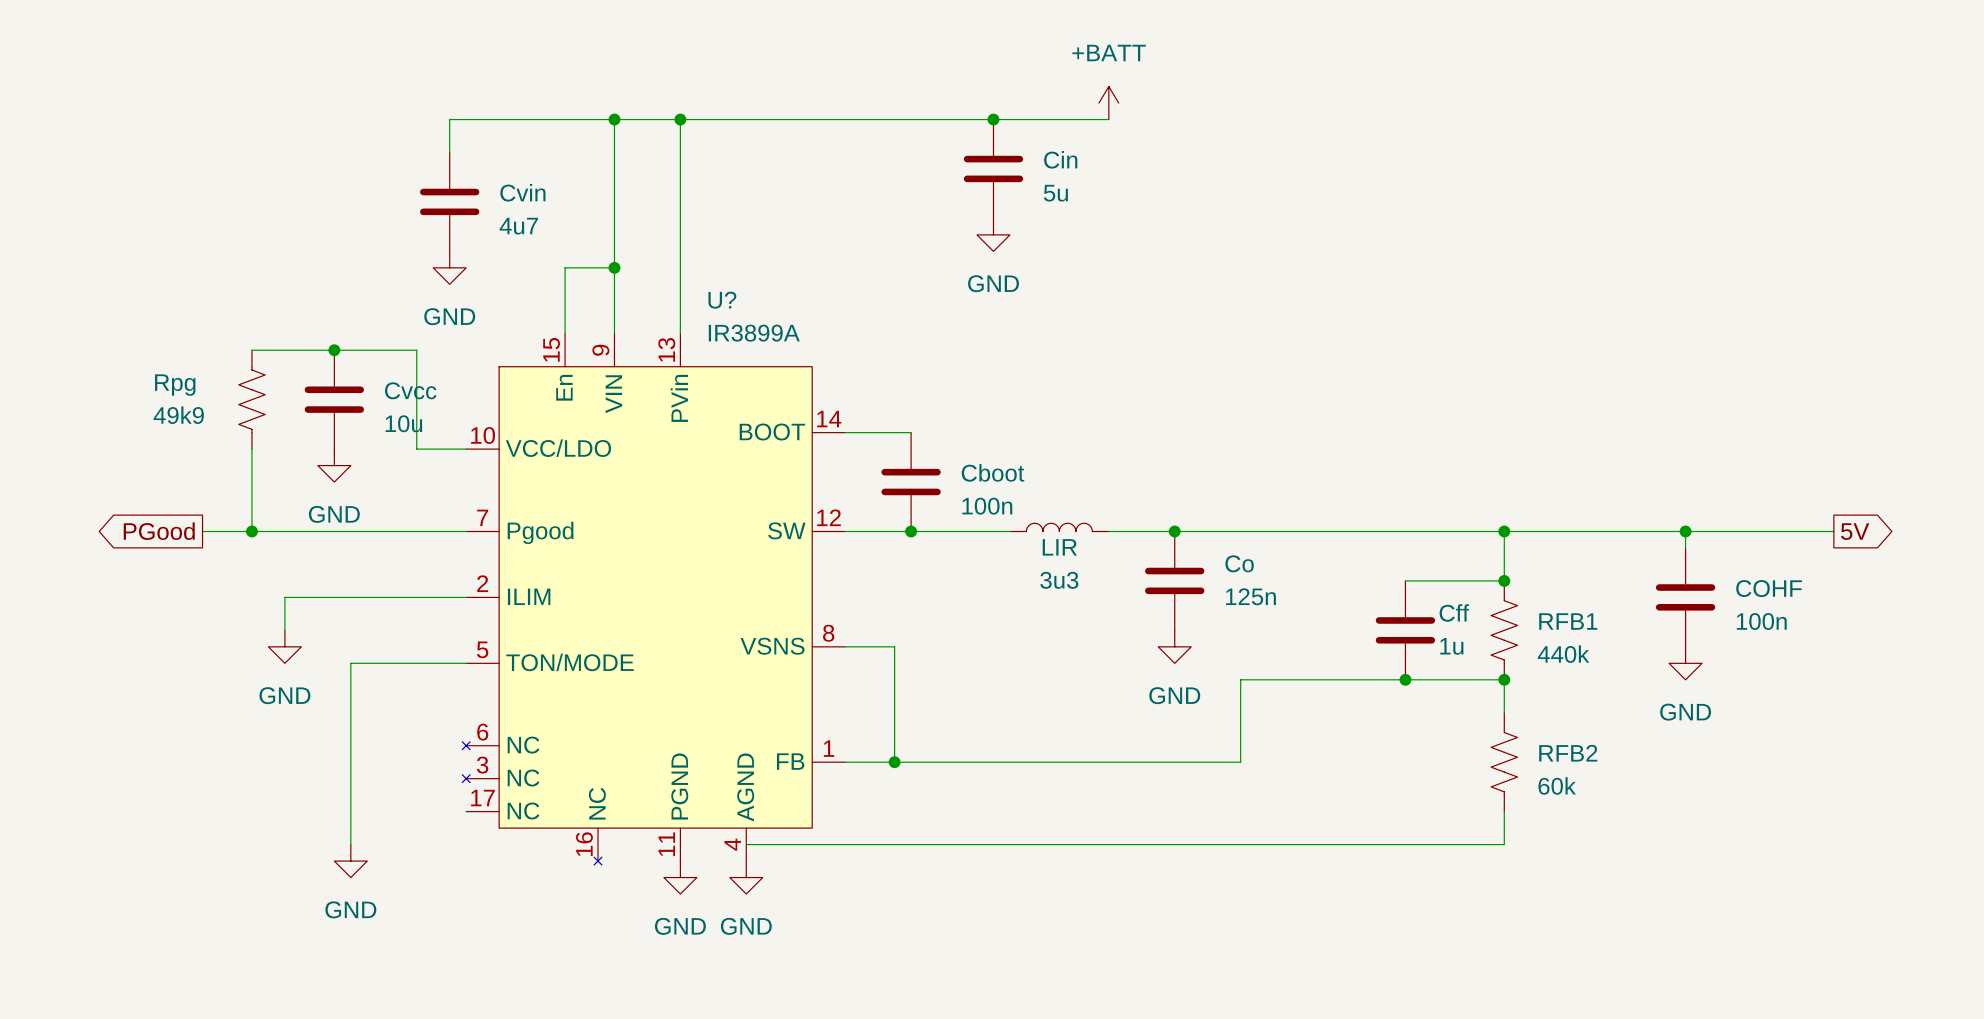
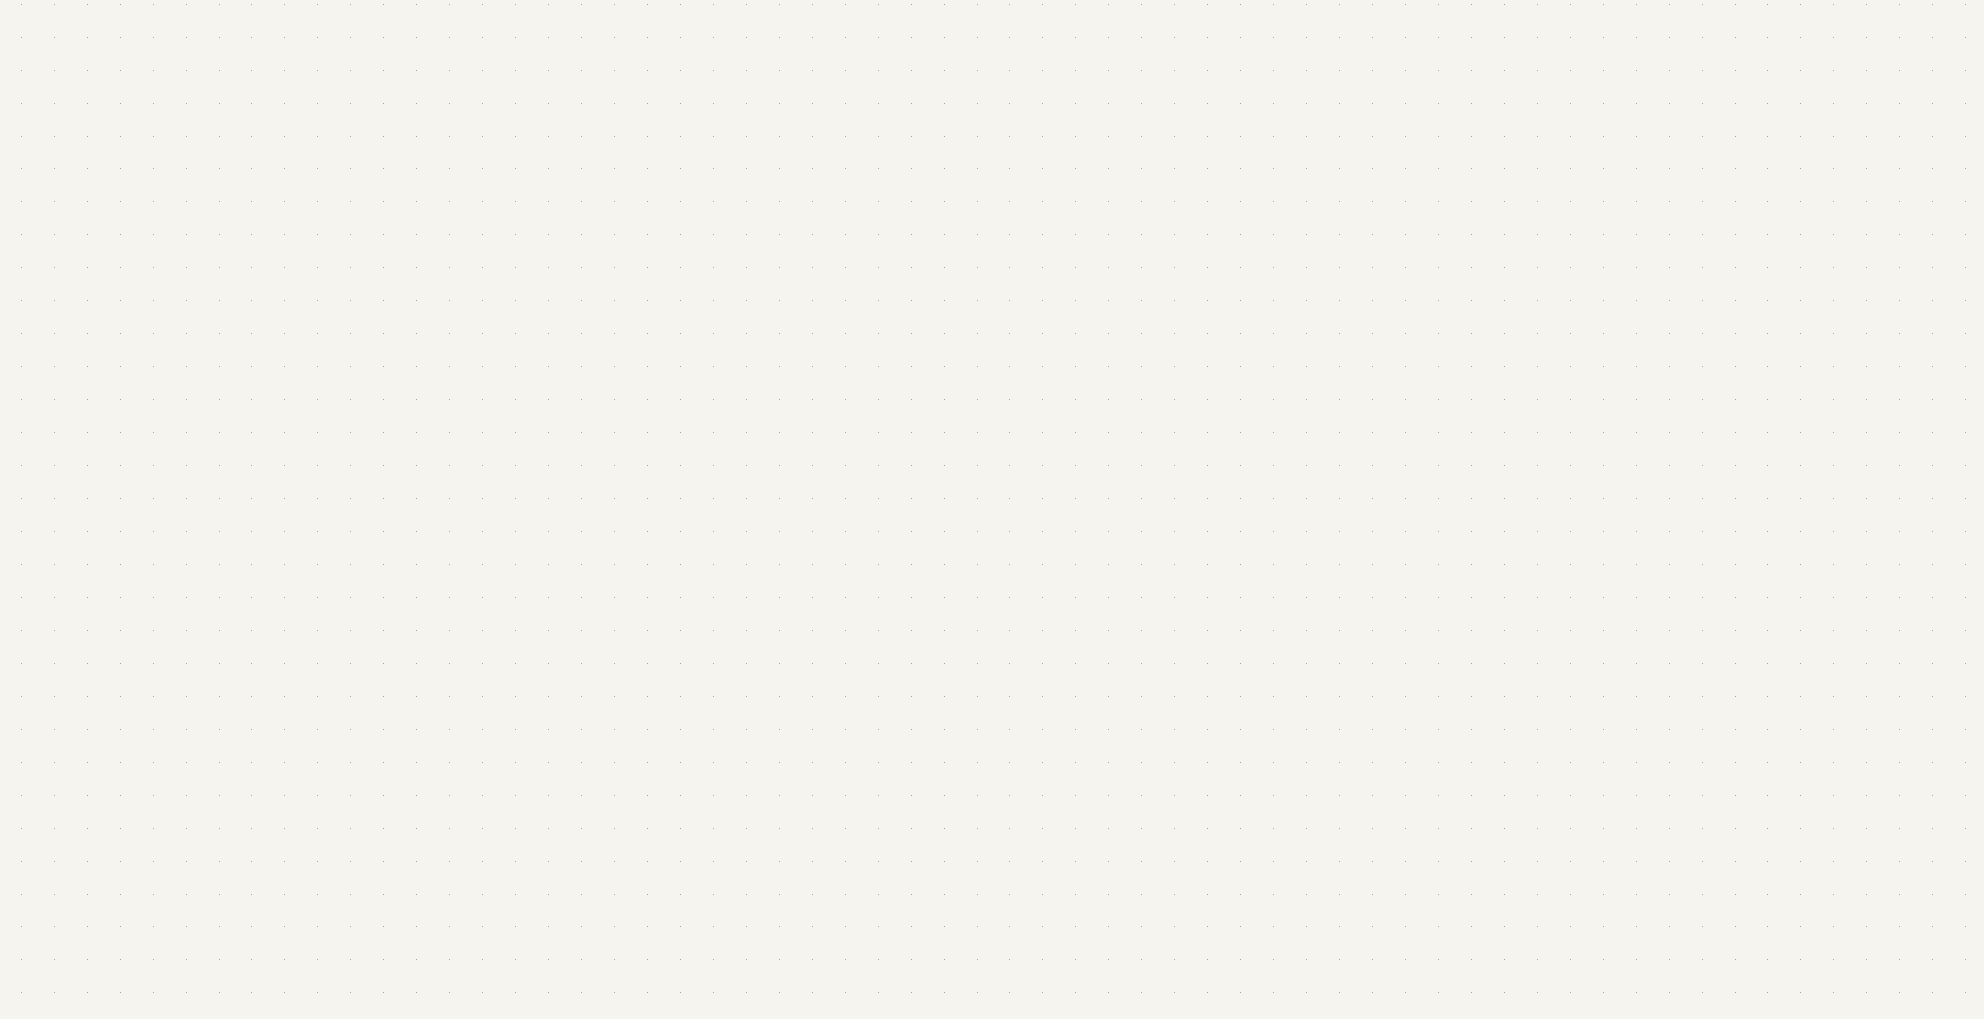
power symbol: +BATT (1108, 103) -> none
wire: (614, 119) (614, 333) -> none
junction: (614, 119) -> none
wire: (680, 119) (680, 333) -> none
junction: (680, 119) -> none
junction: (993, 119) -> none
wire: (1108, 119) (449, 119) (449, 152) -> none
Cin: 5u (993, 168) -> none
Cvin: 4u7 (449, 201) -> none
power symbol: GND (993, 234) -> none
power symbol: GND (449, 267) -> none
wire: (614, 267) (565, 267) (565, 333) -> none
junction: (614, 267) -> none
wire: (251, 350) (416, 350) (416, 449) (466, 449) -> none
junction: (334, 350) -> none
Rpg: 49k9 (251, 399) -> none
Cvcc: 10u (334, 399) -> none
wire: (845, 432) (911, 432) -> none
wire: (251, 449) (251, 531) -> none
power symbol: GND (334, 465) -> none
Cboot: 100n (911, 482) -> none
LIR: 3u3 (1059, 527) -> none
global label: PGood (159, 531) -> none
wire: (202, 531) (466, 531) -> none
junction: (251, 531) -> none
wire: (845, 531) (1009, 531) -> none
junction: (911, 531) -> none
wire: (1108, 531) (1833, 531) -> none
junction: (1174, 531) -> none
wire: (1504, 531) (1504, 580) (1405, 580) -> none
junction: (1504, 531) -> none
wire: (1685, 531) (1685, 547) -> none
junction: (1685, 531) -> none
global label: 5V (1855, 531) -> none
Co: 125n (1174, 580) -> none
junction: (1504, 580) -> none
wire: (466, 597) (284, 597) (284, 630) -> none
COHF: 100n (1685, 597) -> none
U?: IR3899A (653, 599) -> none
Cff: 1u (1405, 630) -> none
RFB1: 440k (1504, 630) -> none
power symbol: GND (284, 646) -> none
wire: (845, 646) (894, 646) (894, 762) -> none
power symbol: GND (1174, 646) -> none
wire: (466, 663) (350, 663) (350, 844) -> none
power symbol: GND (1685, 663) -> none
junction: (1405, 679) -> none
junction: (1504, 679) -> none
wire: (1504, 712) (1504, 679) (1240, 679) (1240, 762) (845, 762) -> none
junction: (894, 762) -> none
RFB2: 60k (1504, 762) -> none
wire: (1504, 811) (1504, 844) (746, 844) -> none
power symbol: GND (350, 861) -> none
power symbol: GND (680, 877) -> none
power symbol: GND (746, 877) -> none

